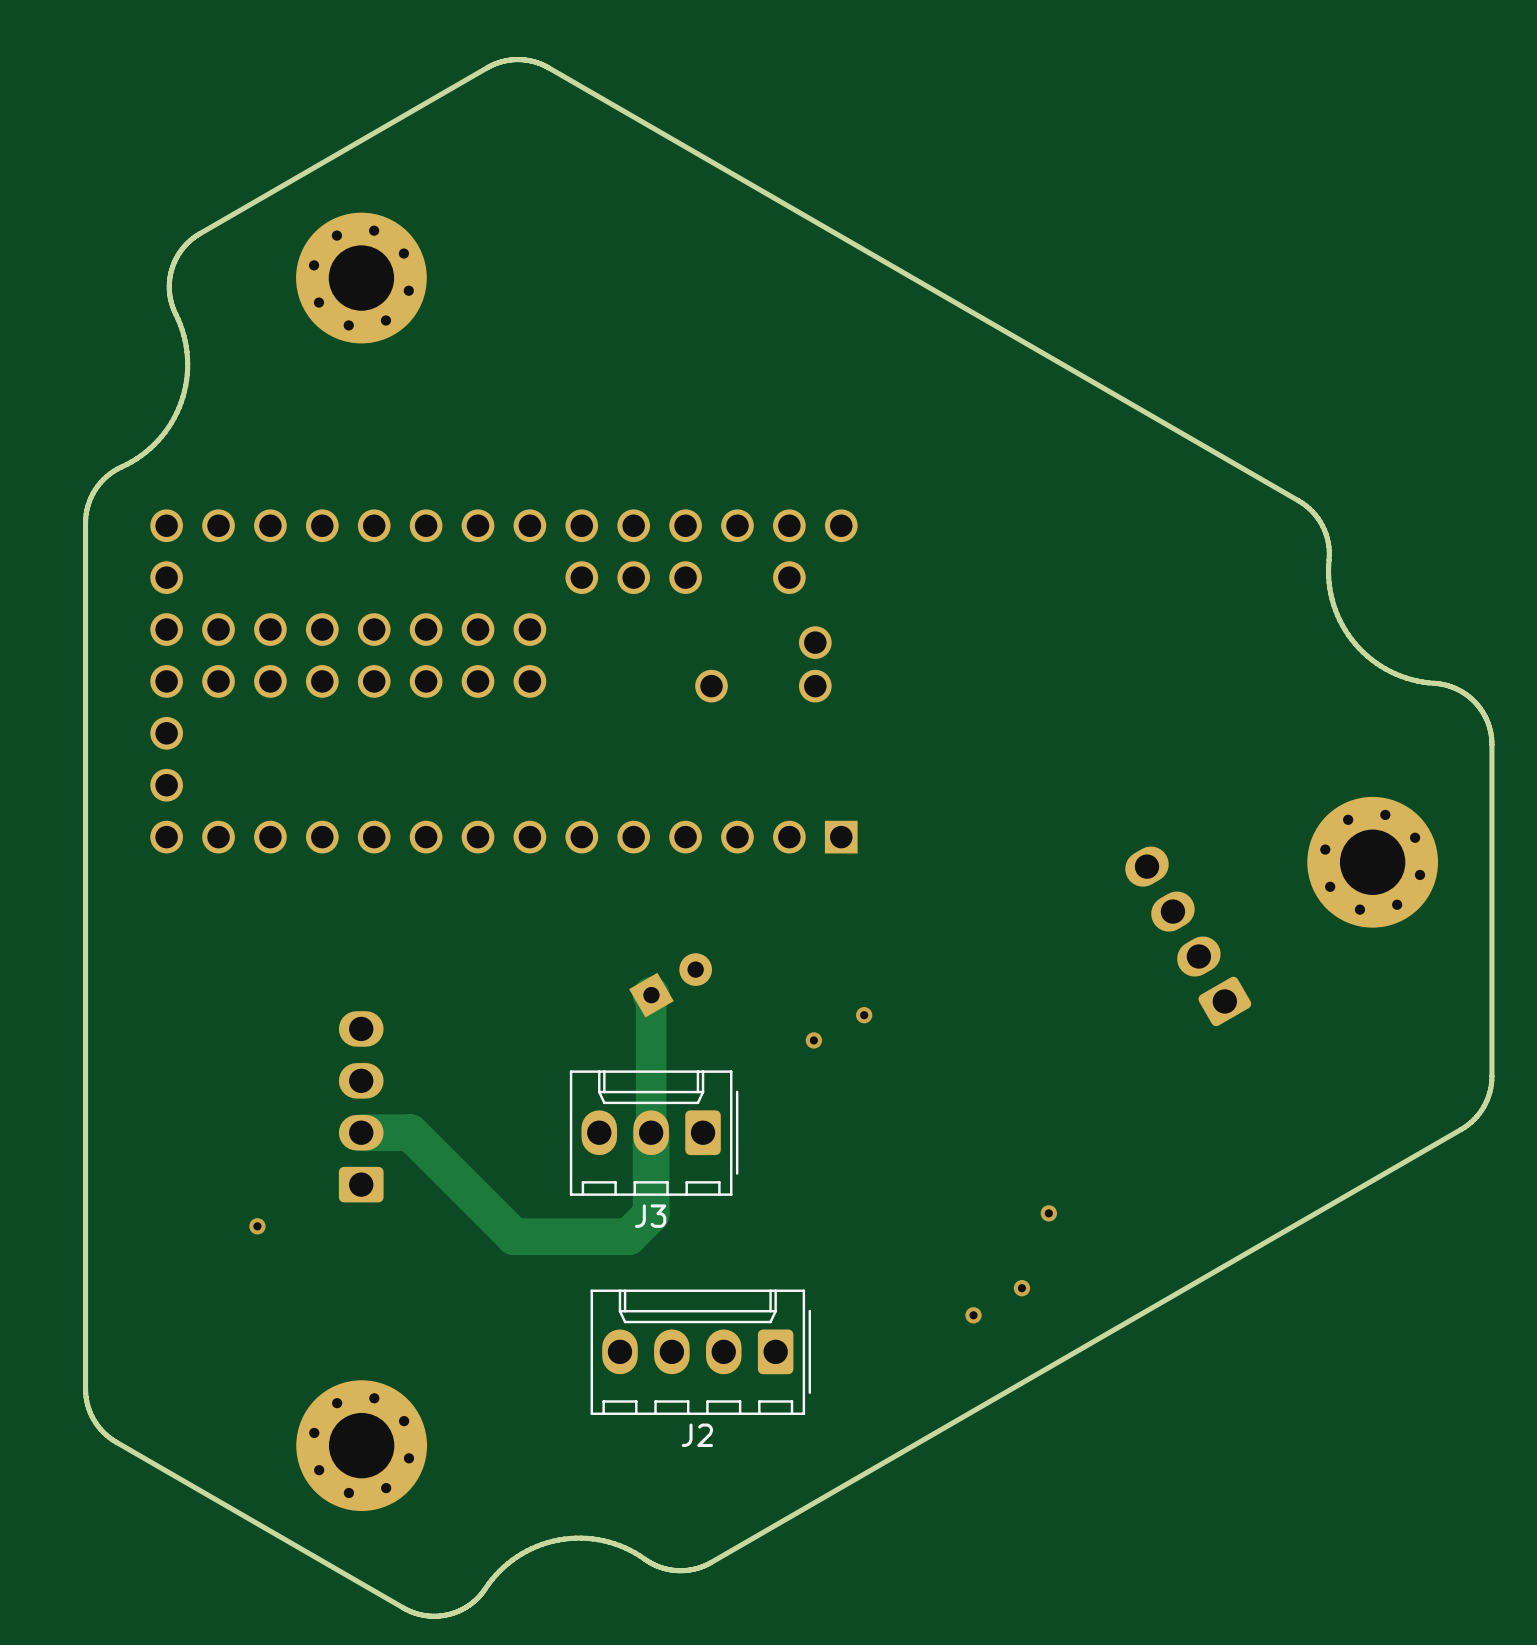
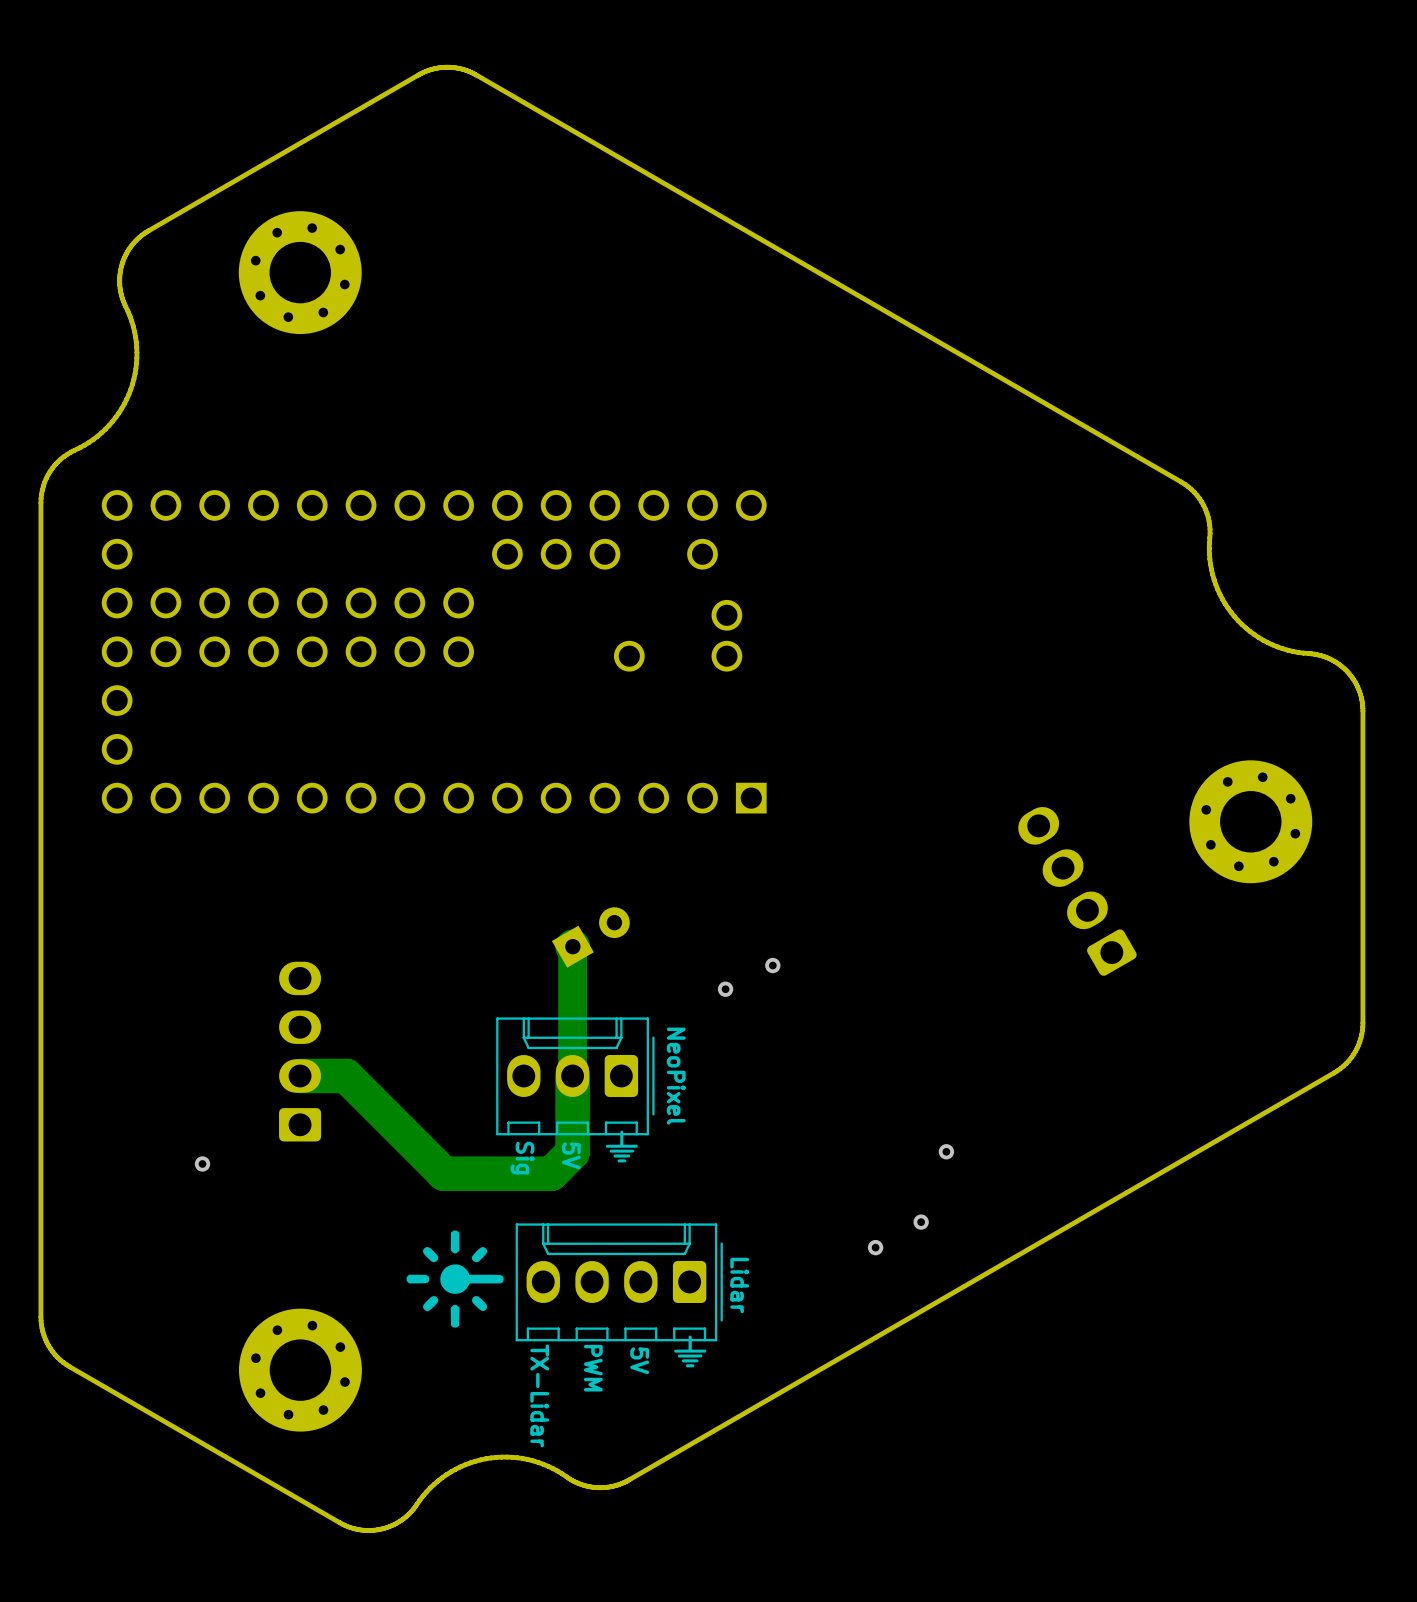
text: none -> NeoPixel (676, 1076)
drawing: none -> [605, 1130, 638, 1163]
J3 name: J3 (650, 1216) -> none
text: none -> 5V (571, 1155)
text: none -> Sig (522, 1158)
drawing: none -> [406, 1230, 504, 1328]
text: none -> Lidar (739, 1285)
drawing: none -> [674, 1335, 707, 1368]
J2 name: J2 (697, 1435) -> none
text: none -> 5V (639, 1360)
text: none -> PWM (593, 1368)
text: none -> TX-Lidar (539, 1395)

